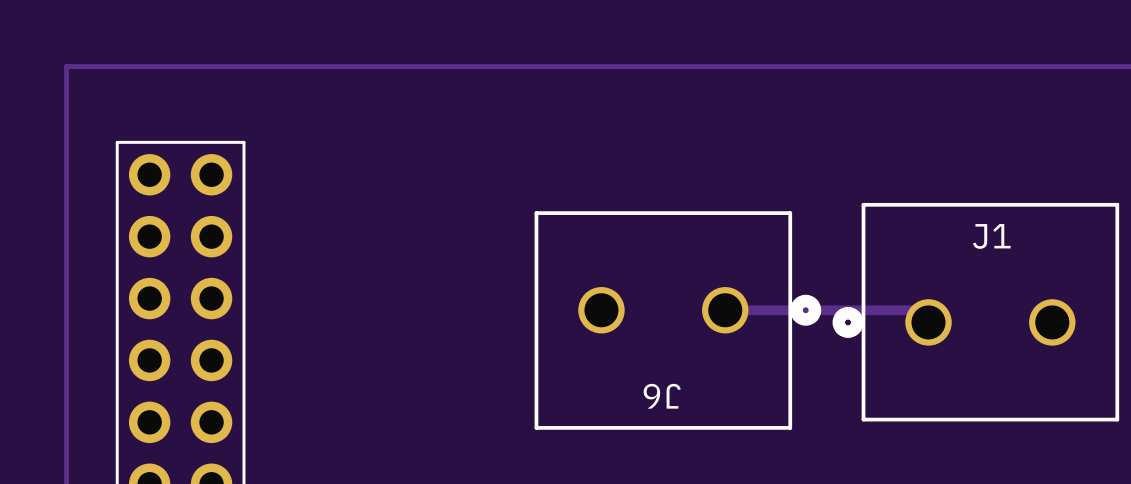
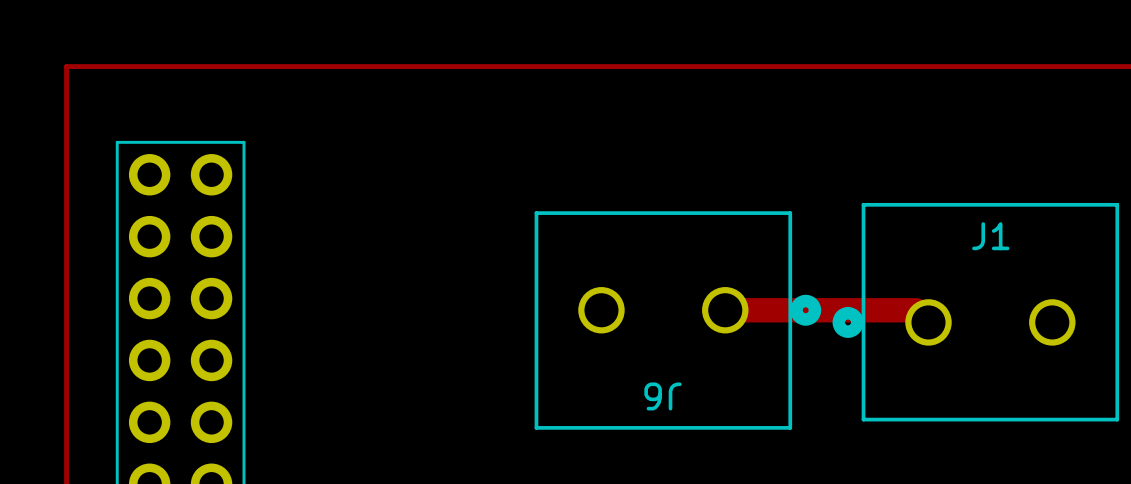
track width: thin (725, 310) (916, 310) -> thick (725, 310) (916, 310)

